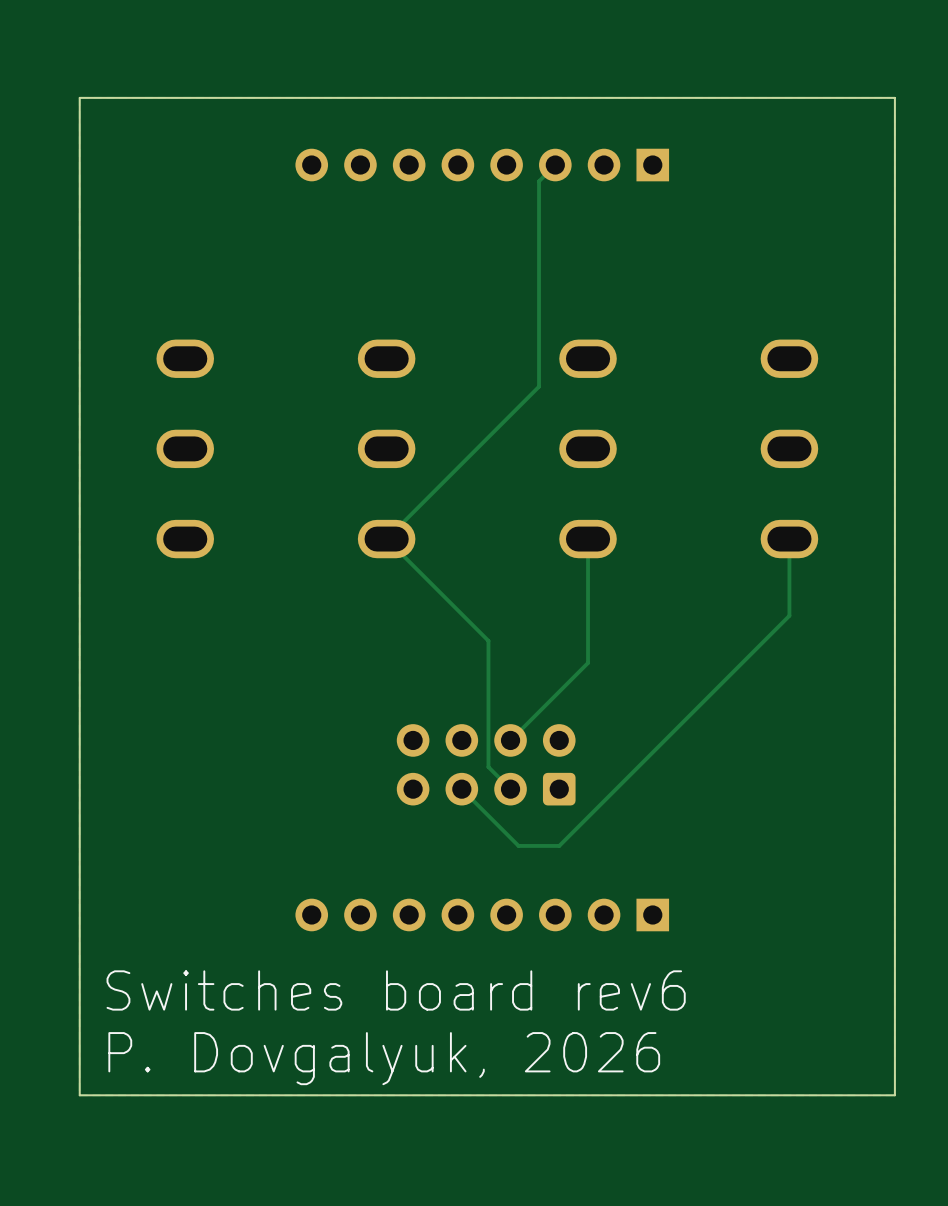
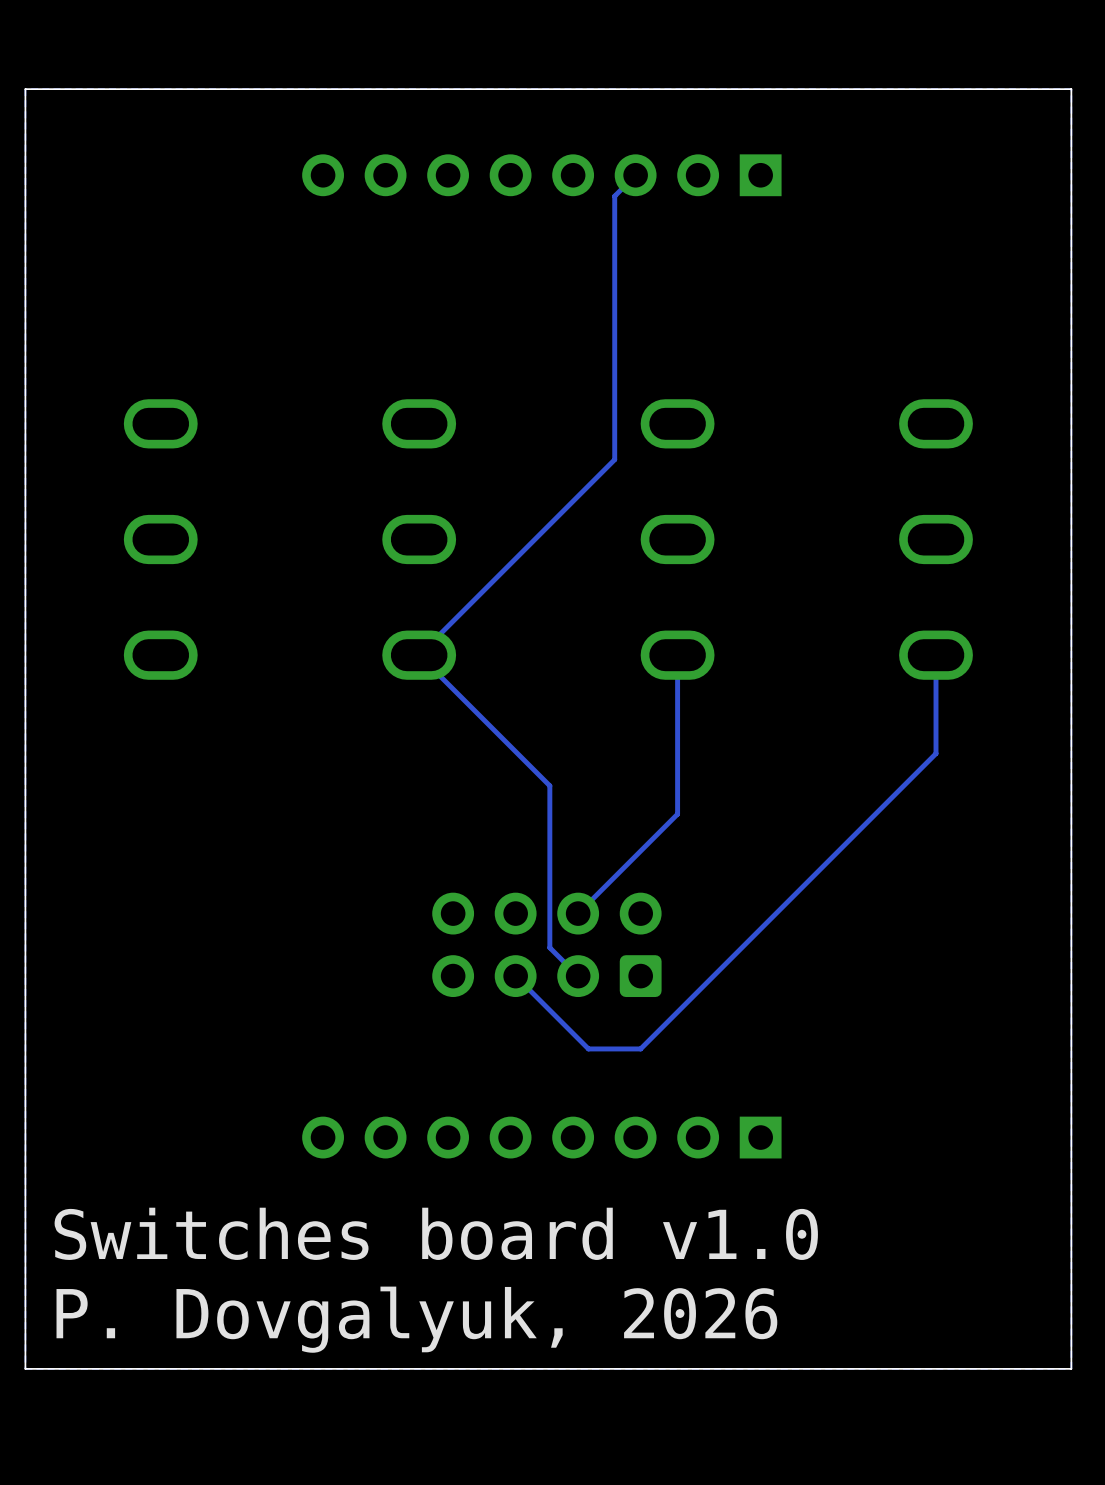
text: Switches board rev6 (396, 990) -> Switches board v1.0 (436, 1233)

